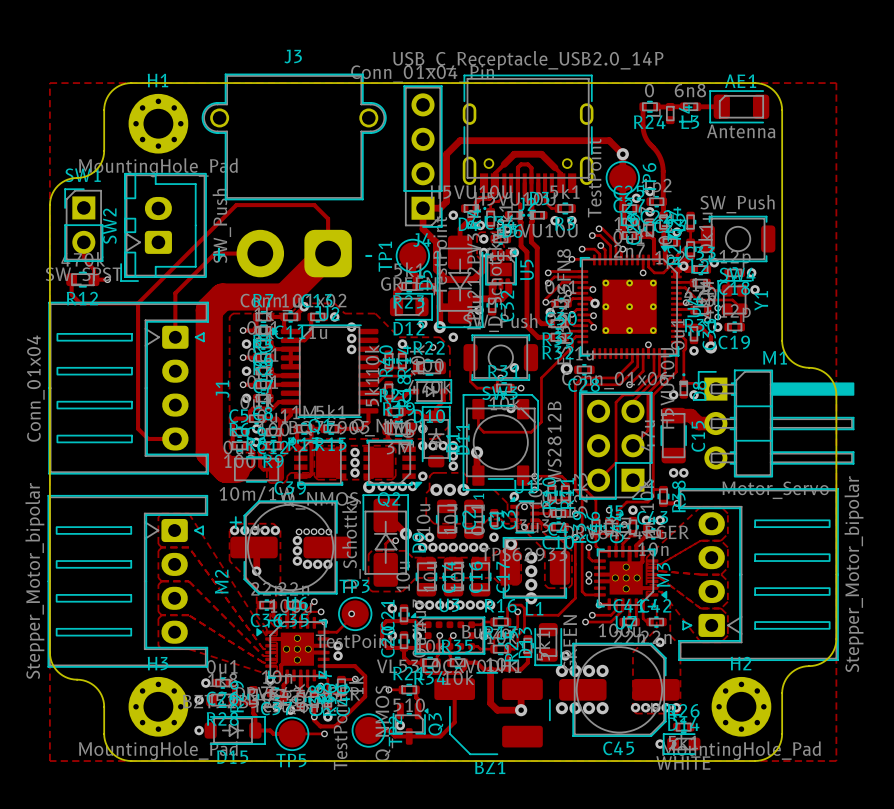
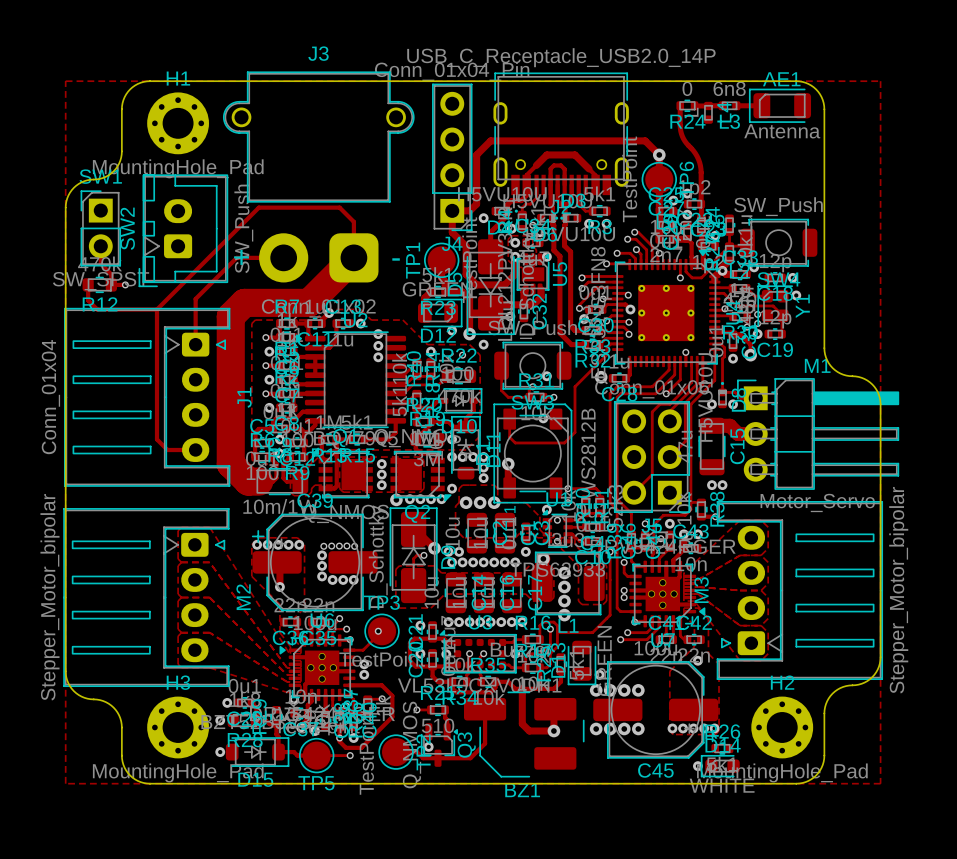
track: none -> (629, 361) (629, 374) (626, 378)

